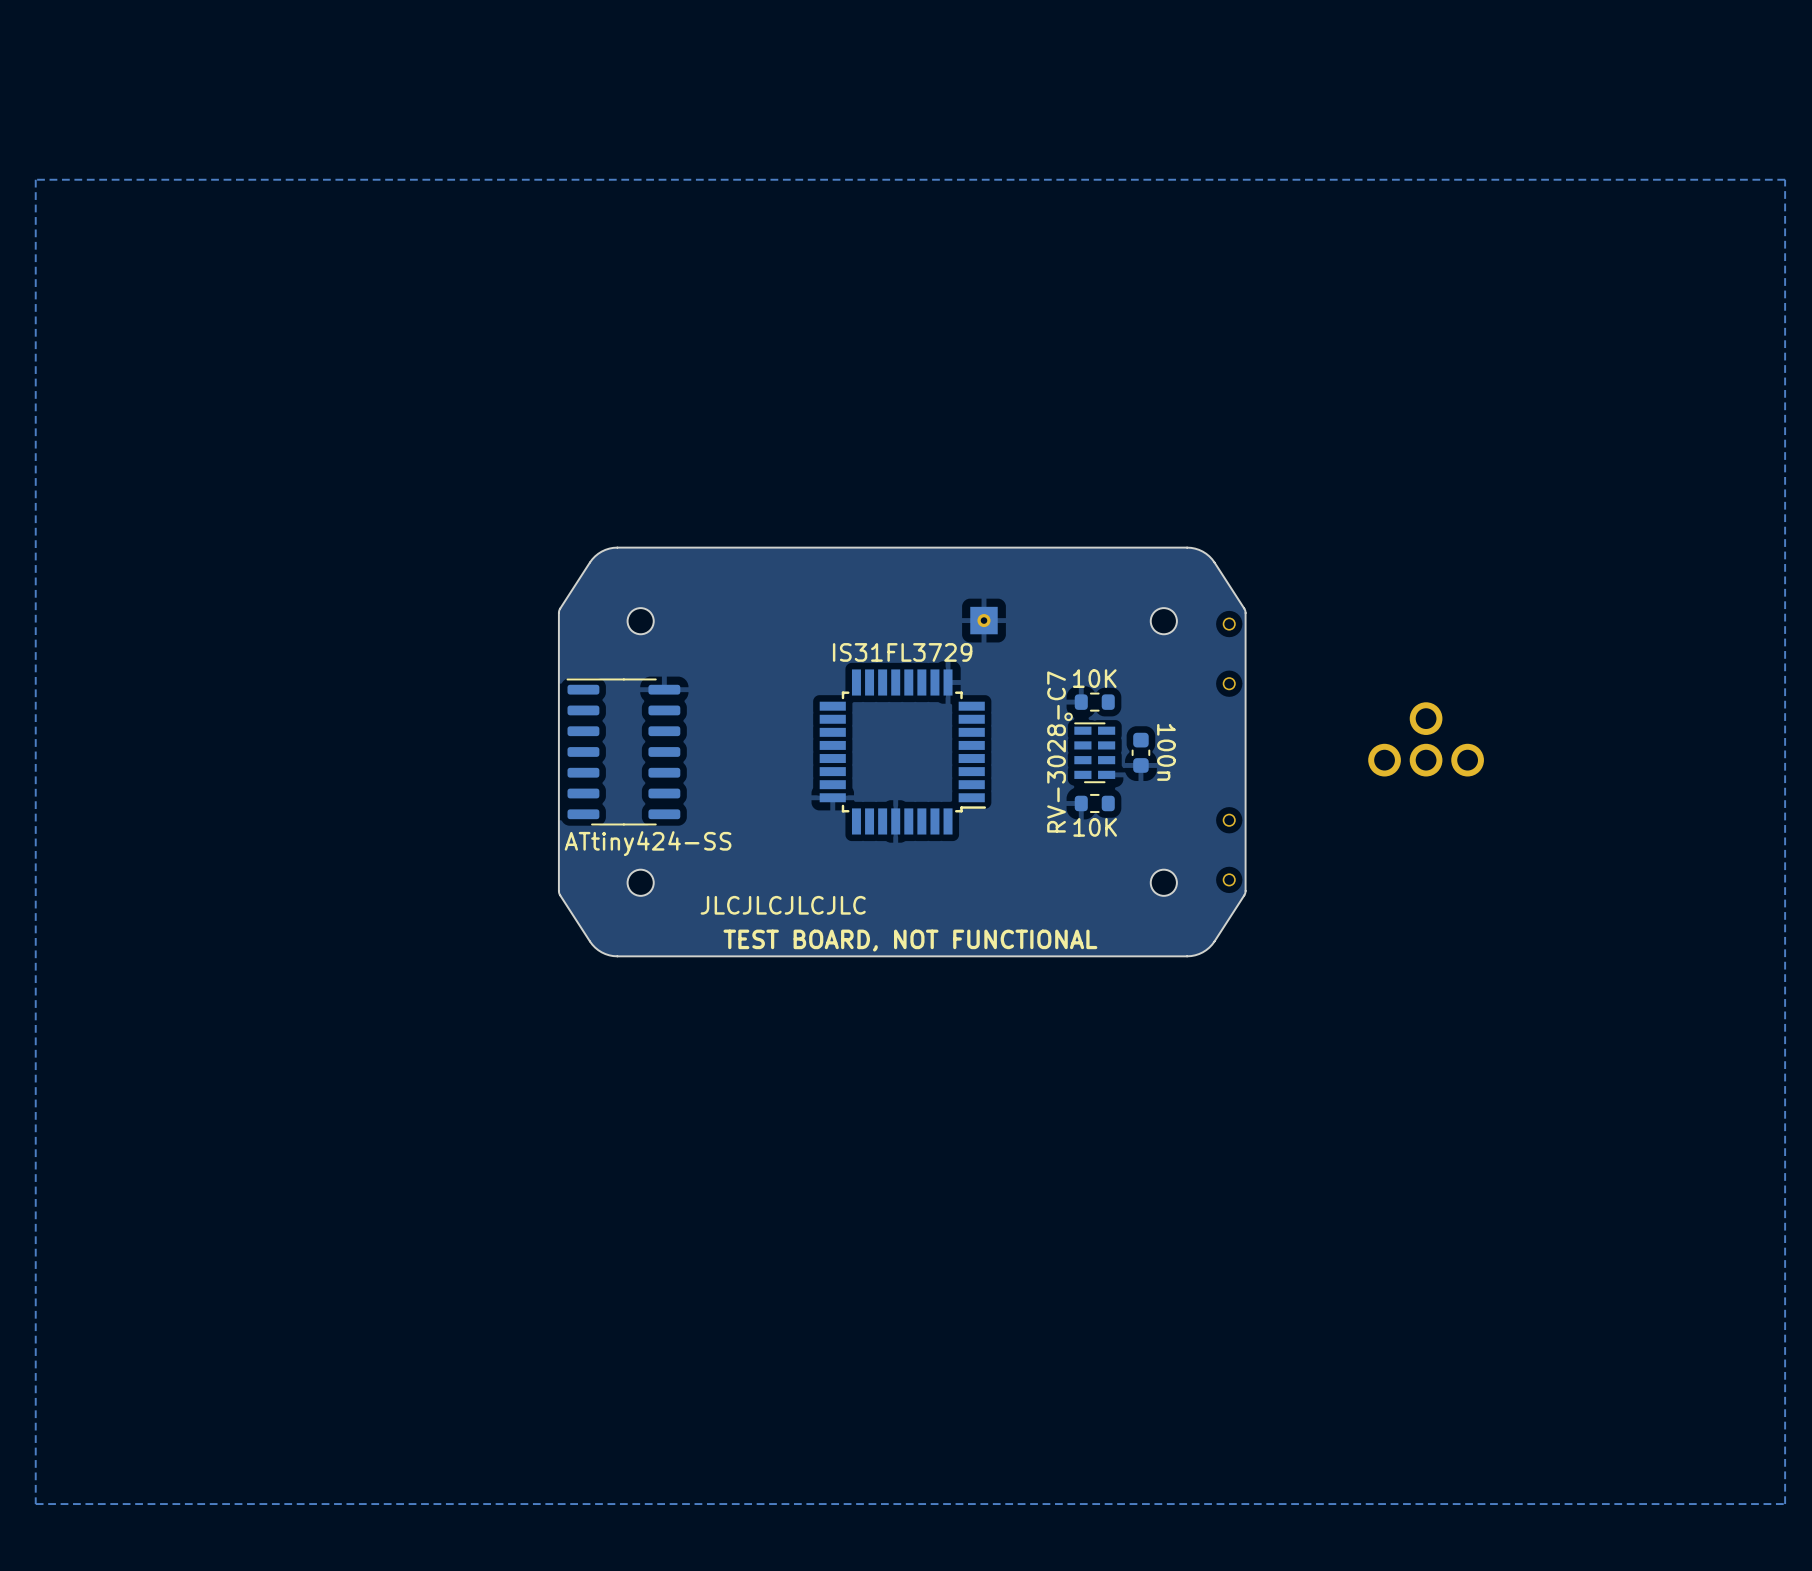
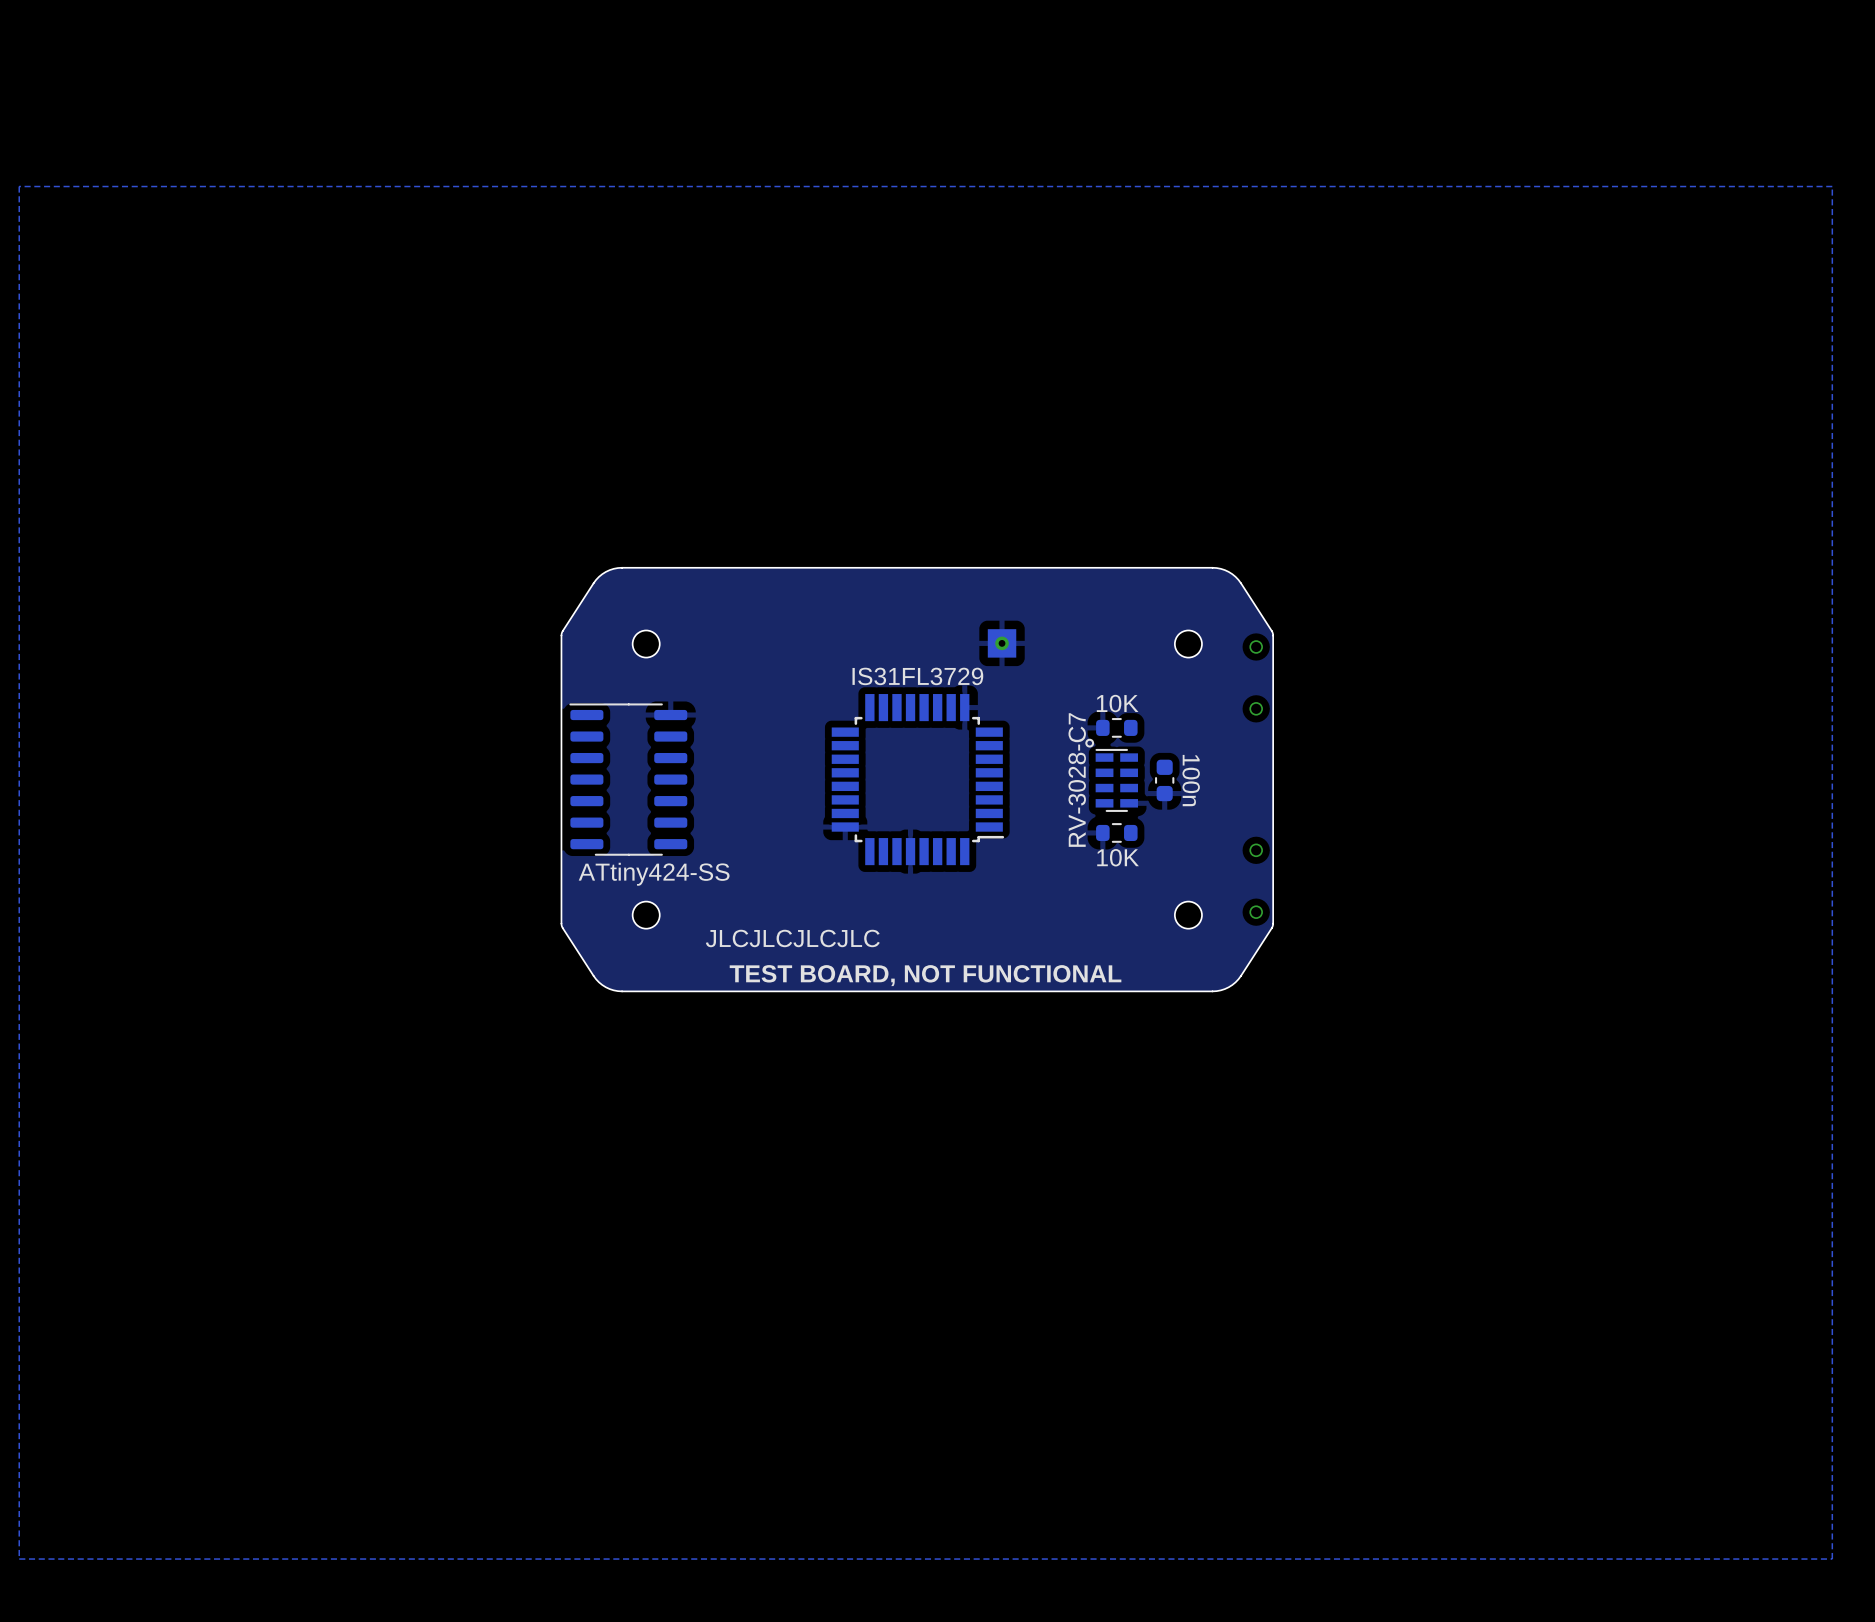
part: (1426, 739) -> none

